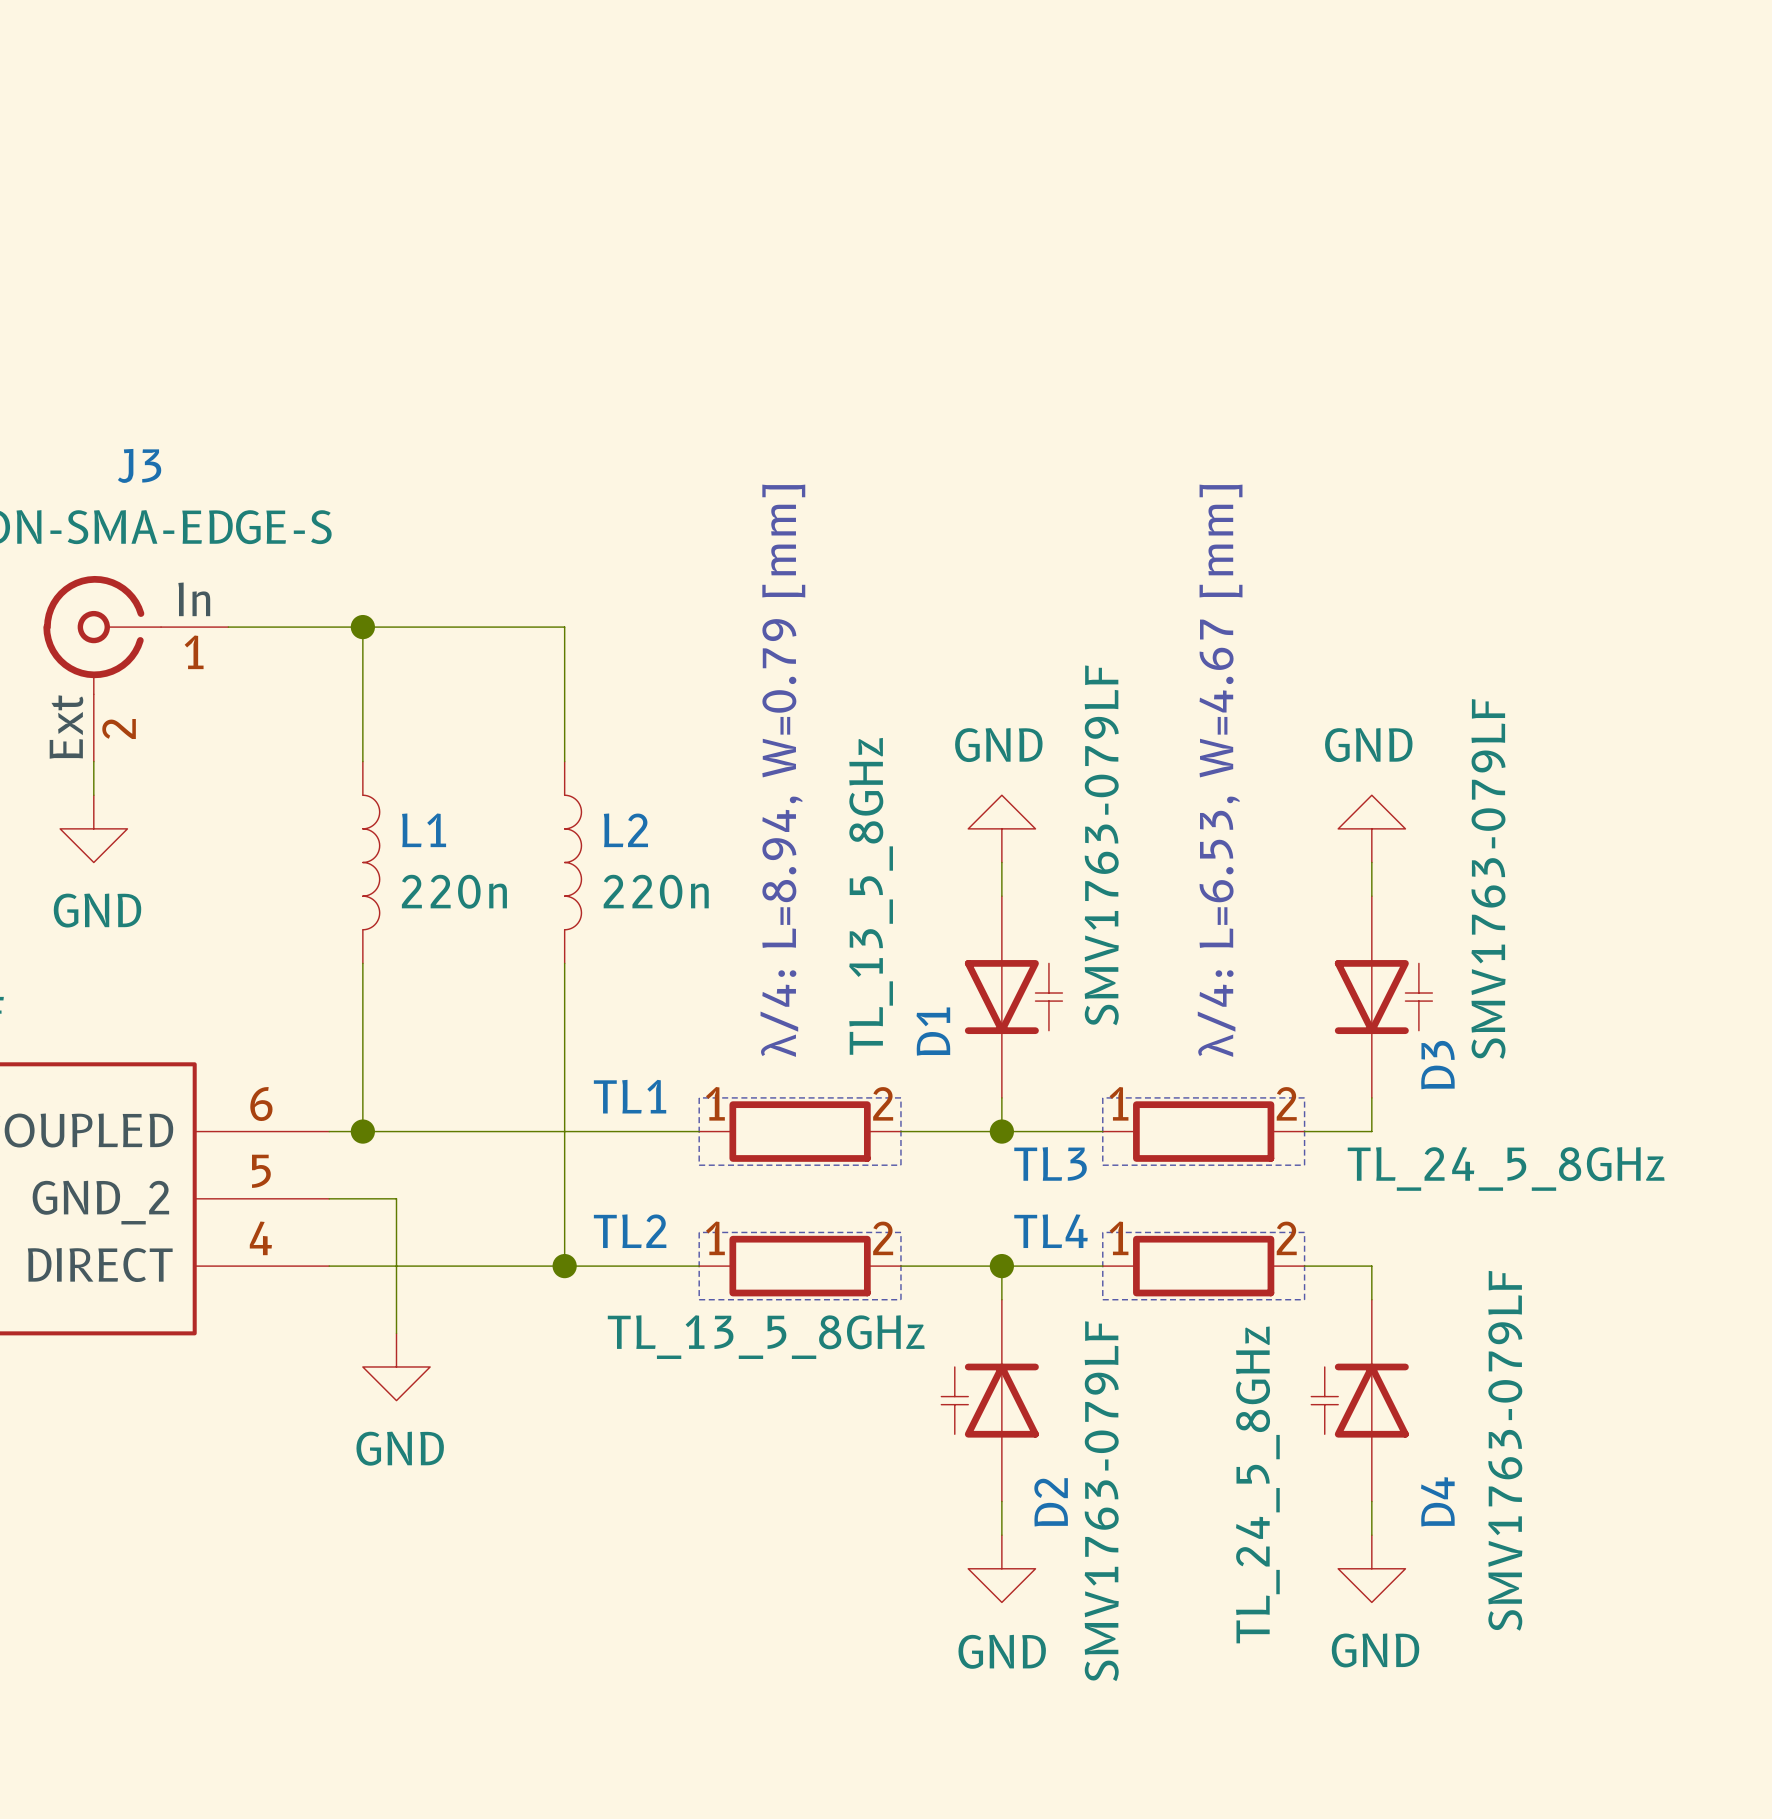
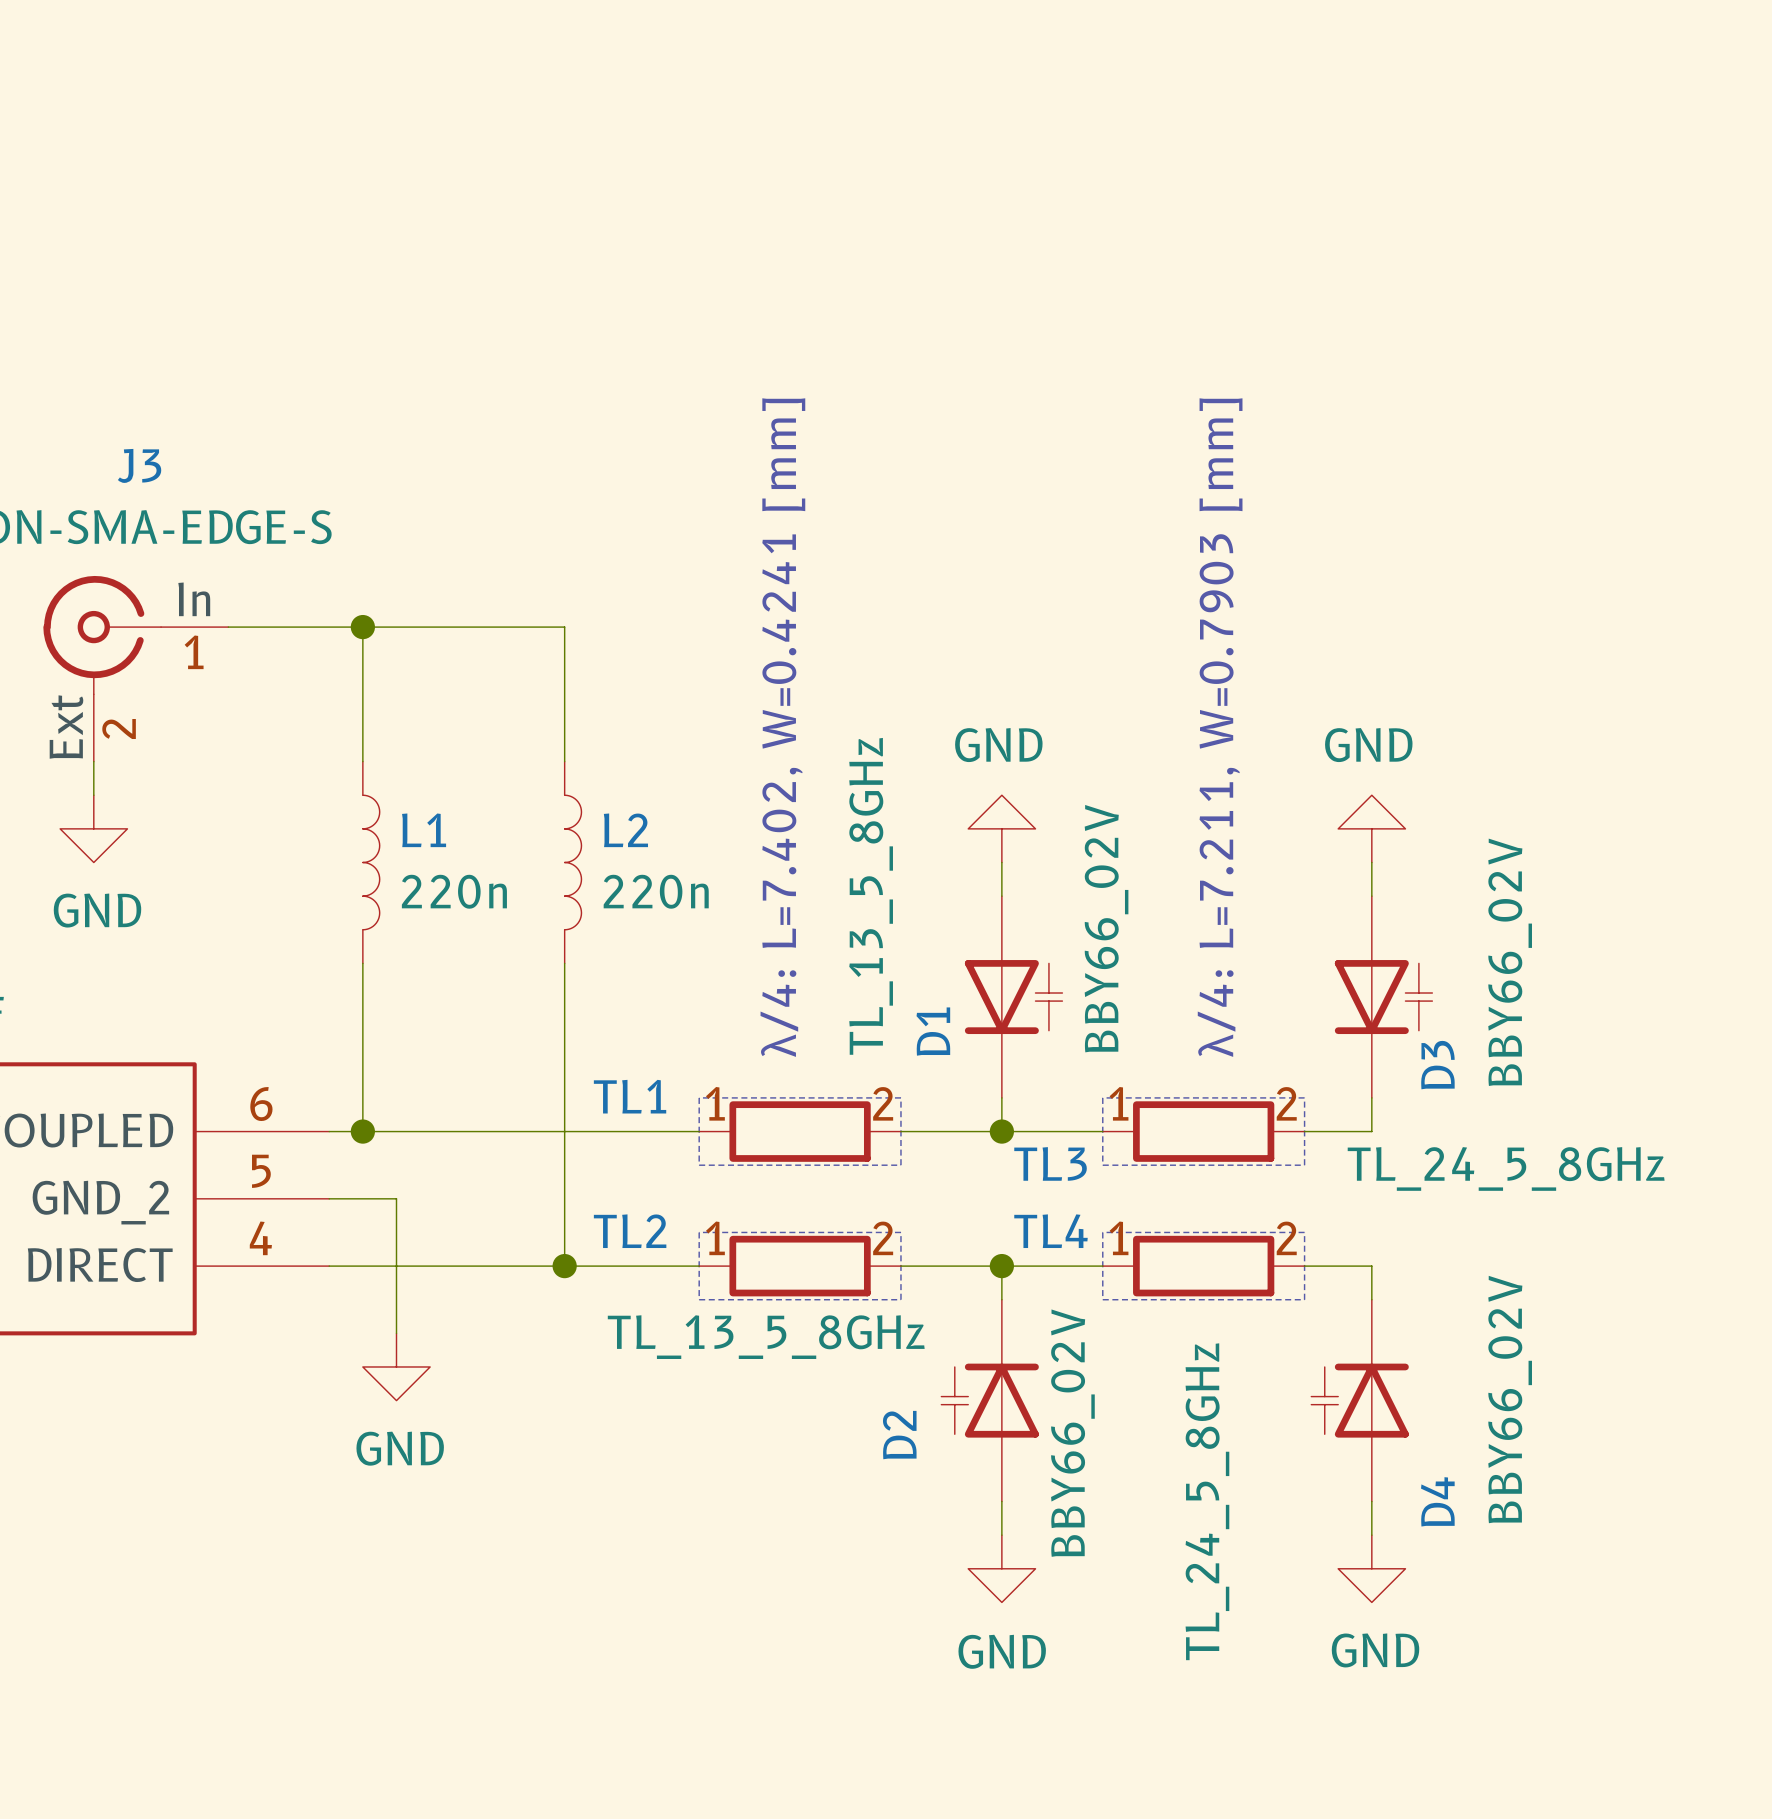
text: λ/4: L=8.94, W=0.79 [mm] (782, 770) -> λ/4: L=7.402, W=0.4241 [mm] (782, 727)
text: λ/4: L=6.53, W=4.67 [mm] (1220, 770) -> λ/4: L=7.211, W=0.7903 [mm] (1220, 727)
D1 value: SMV1763-079LF (1101, 845) -> BBY66_02V (1106, 928)
D3 value: SMV1763-079LF (1488, 879) -> BBY66_02V (1510, 962)
D4 value: SMV1763-079LF (1505, 1450) -> BBY66_02V (1510, 1399)
TL4 value position: TL_24_5_8GHz (1257, 1484) -> TL_24_5_8GHz (1207, 1501)
D2 value: SMV1763-079LF (1101, 1501) -> BBY66_02V (1072, 1433)
D2 name position: D2 (1051, 1502) -> D2 (899, 1435)

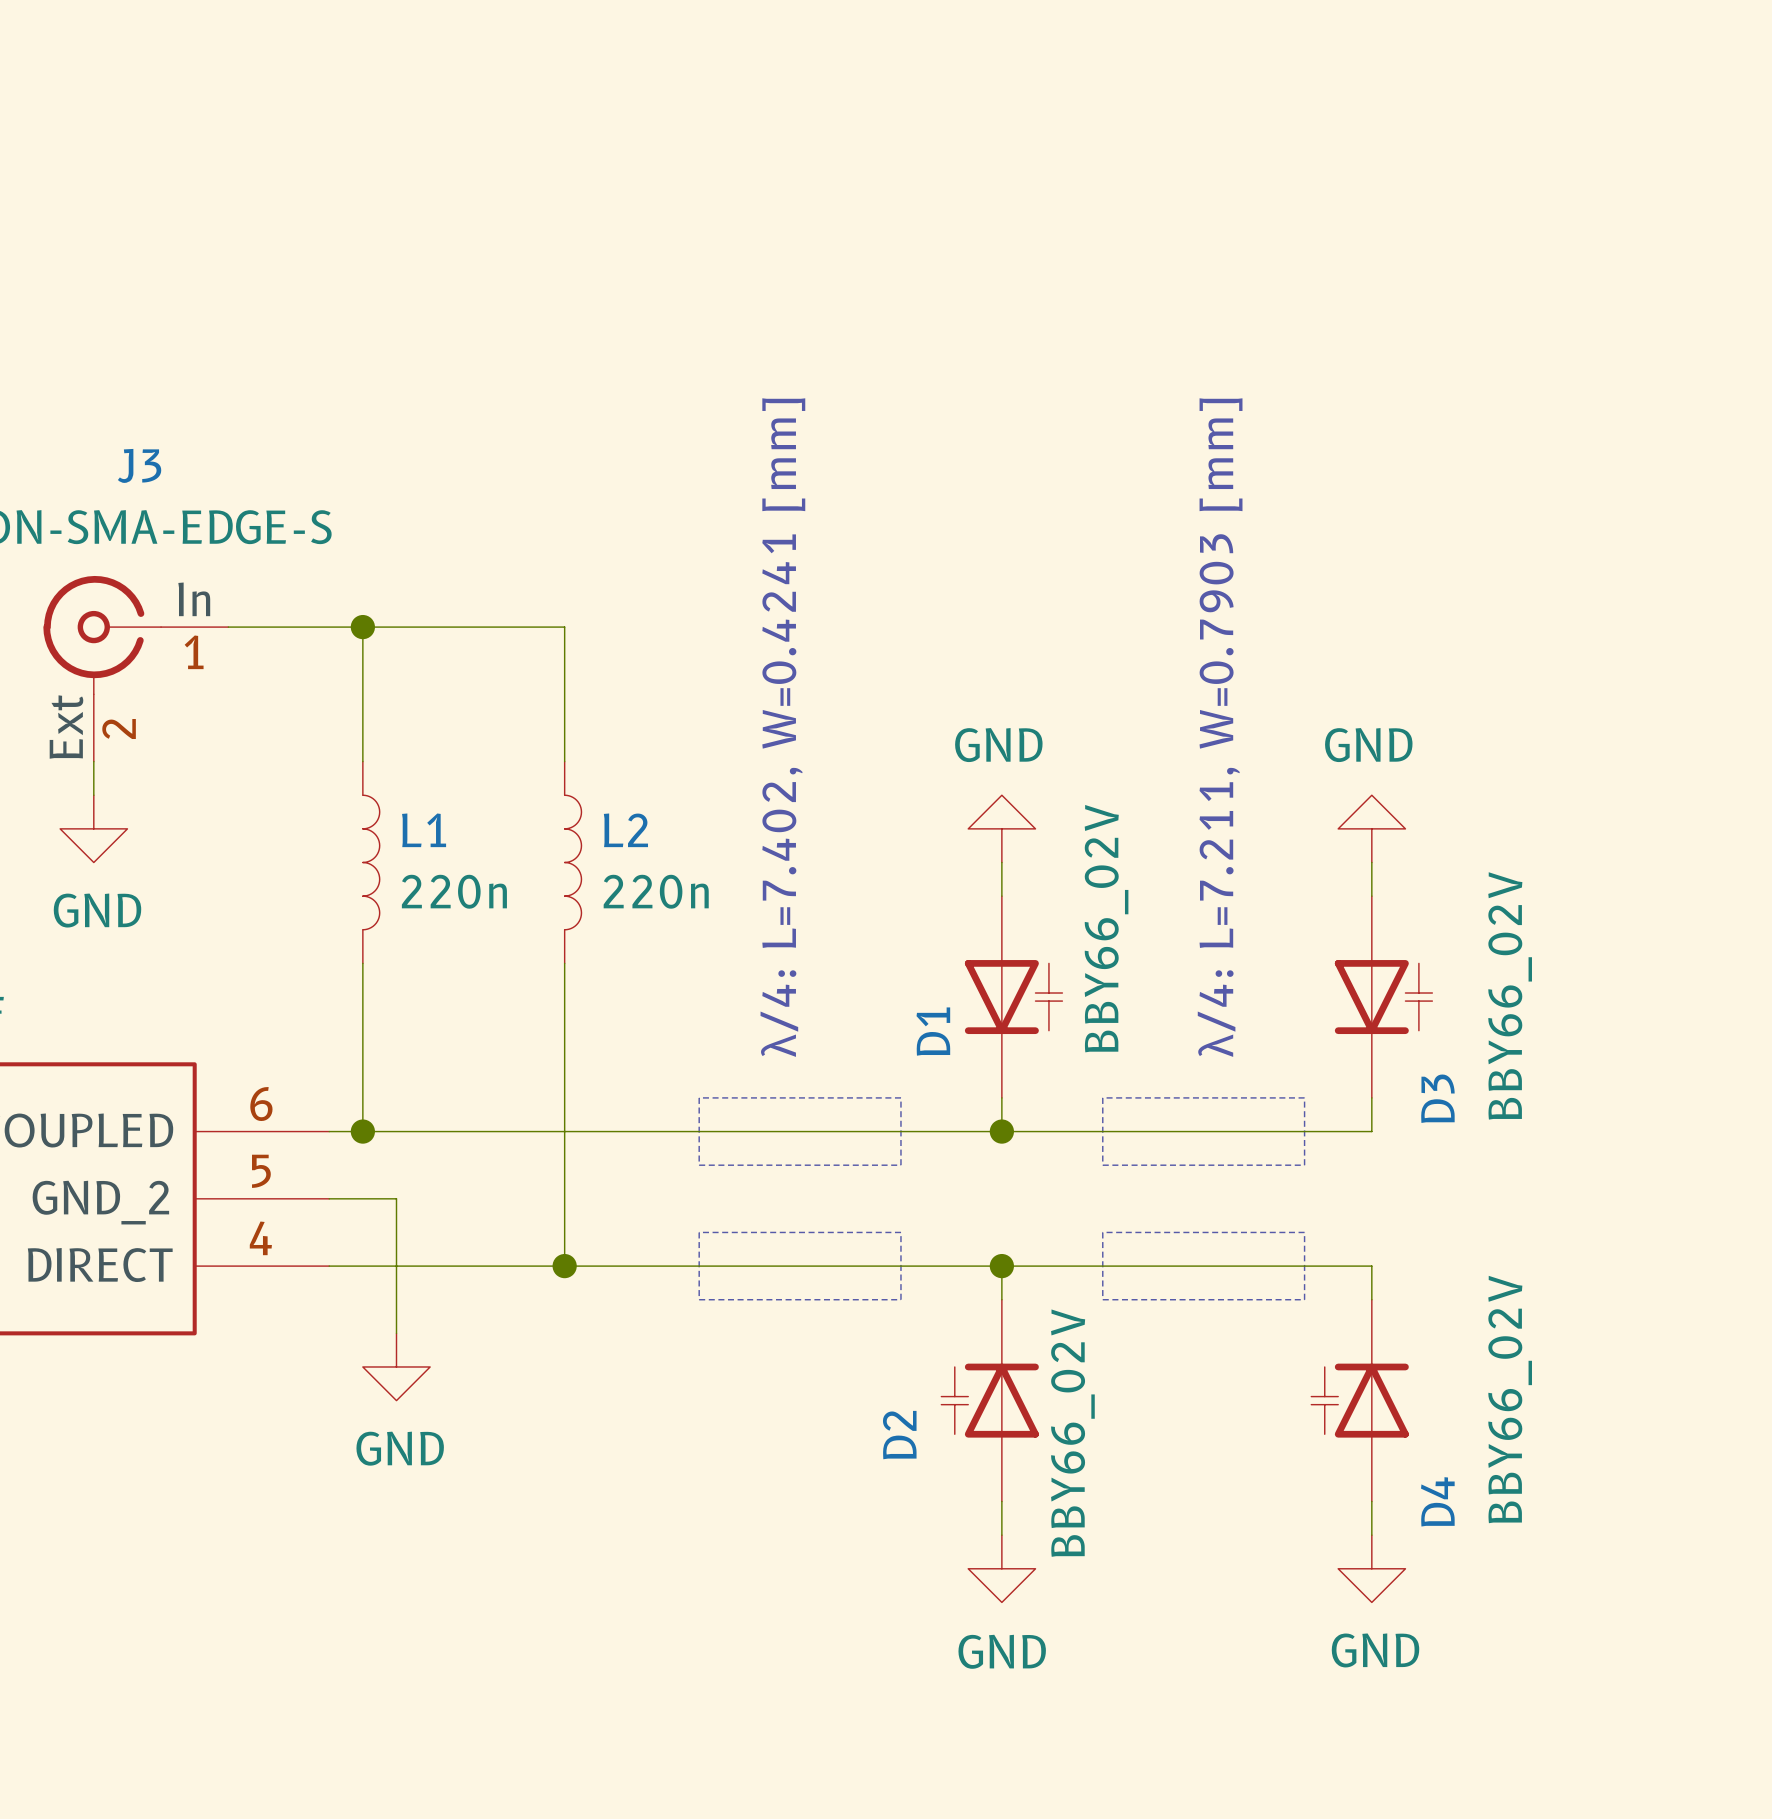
D3 value position: BBY66_02V (1510, 962) -> BBY66_02V (1510, 995)
D3 name position: D3 (1437, 1065) -> D3 (1437, 1098)
wire: none -> (699, 1131) (900, 1131)
TL1: TL_13_5_8GHz (800, 1131) -> none
wire: none -> (1102, 1131) (1304, 1131)
TL3: TL_24_5_8GHz (1203, 1131) -> none
wire: none -> (699, 1266) (900, 1266)
TL2: TL_13_5_8GHz (800, 1266) -> none
wire: none -> (1102, 1266) (1304, 1266)
TL4: TL_24_5_8GHz (1203, 1266) -> none

